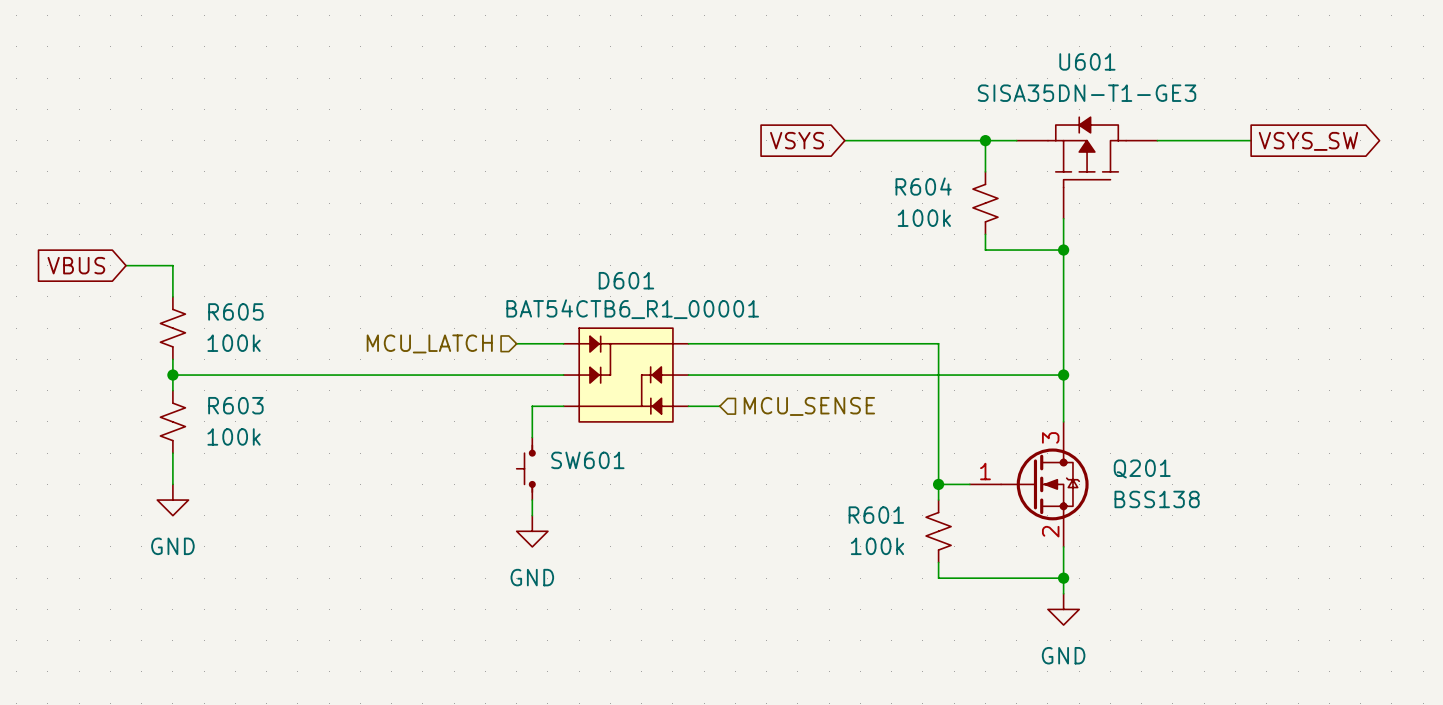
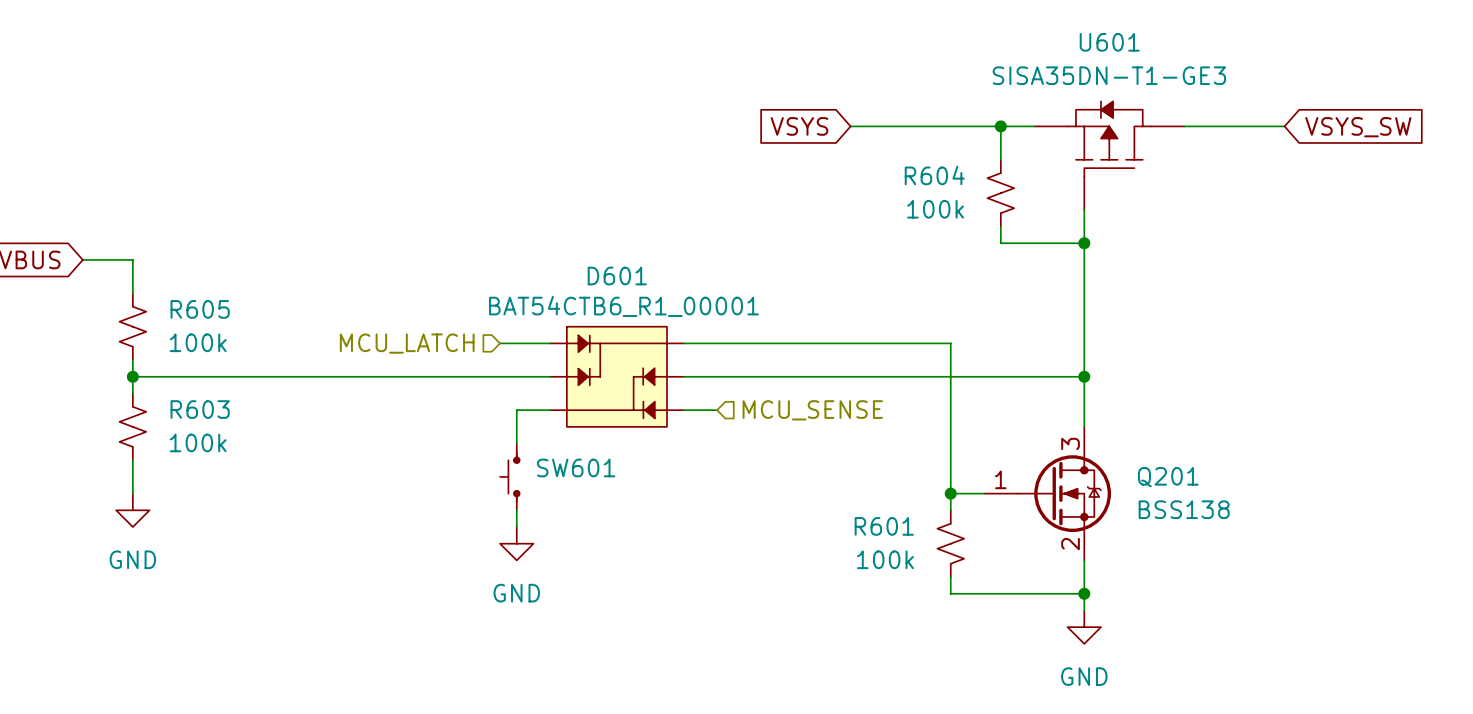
global label shape: output (1308, 141) -> input (1358, 127)

